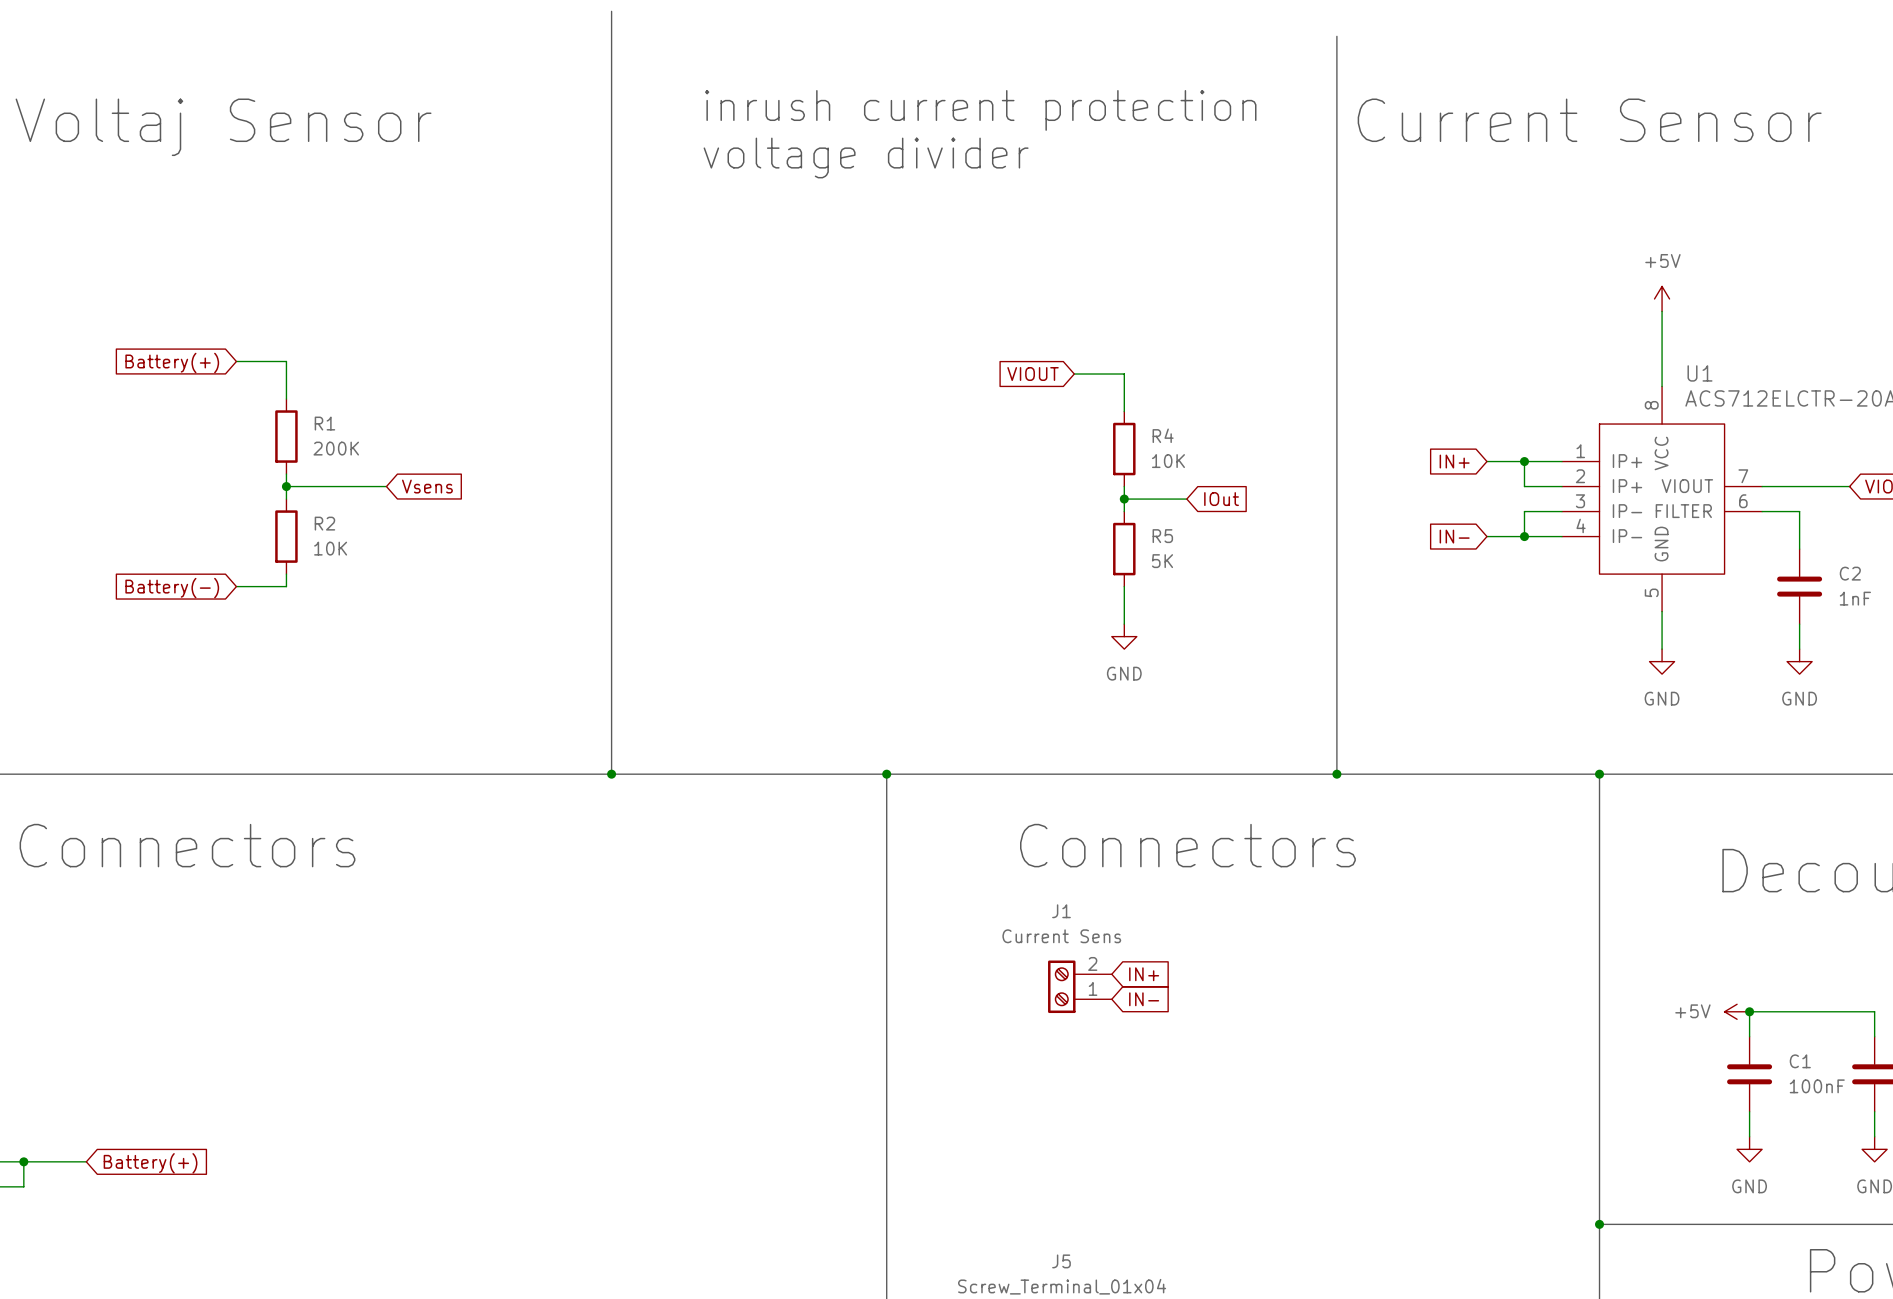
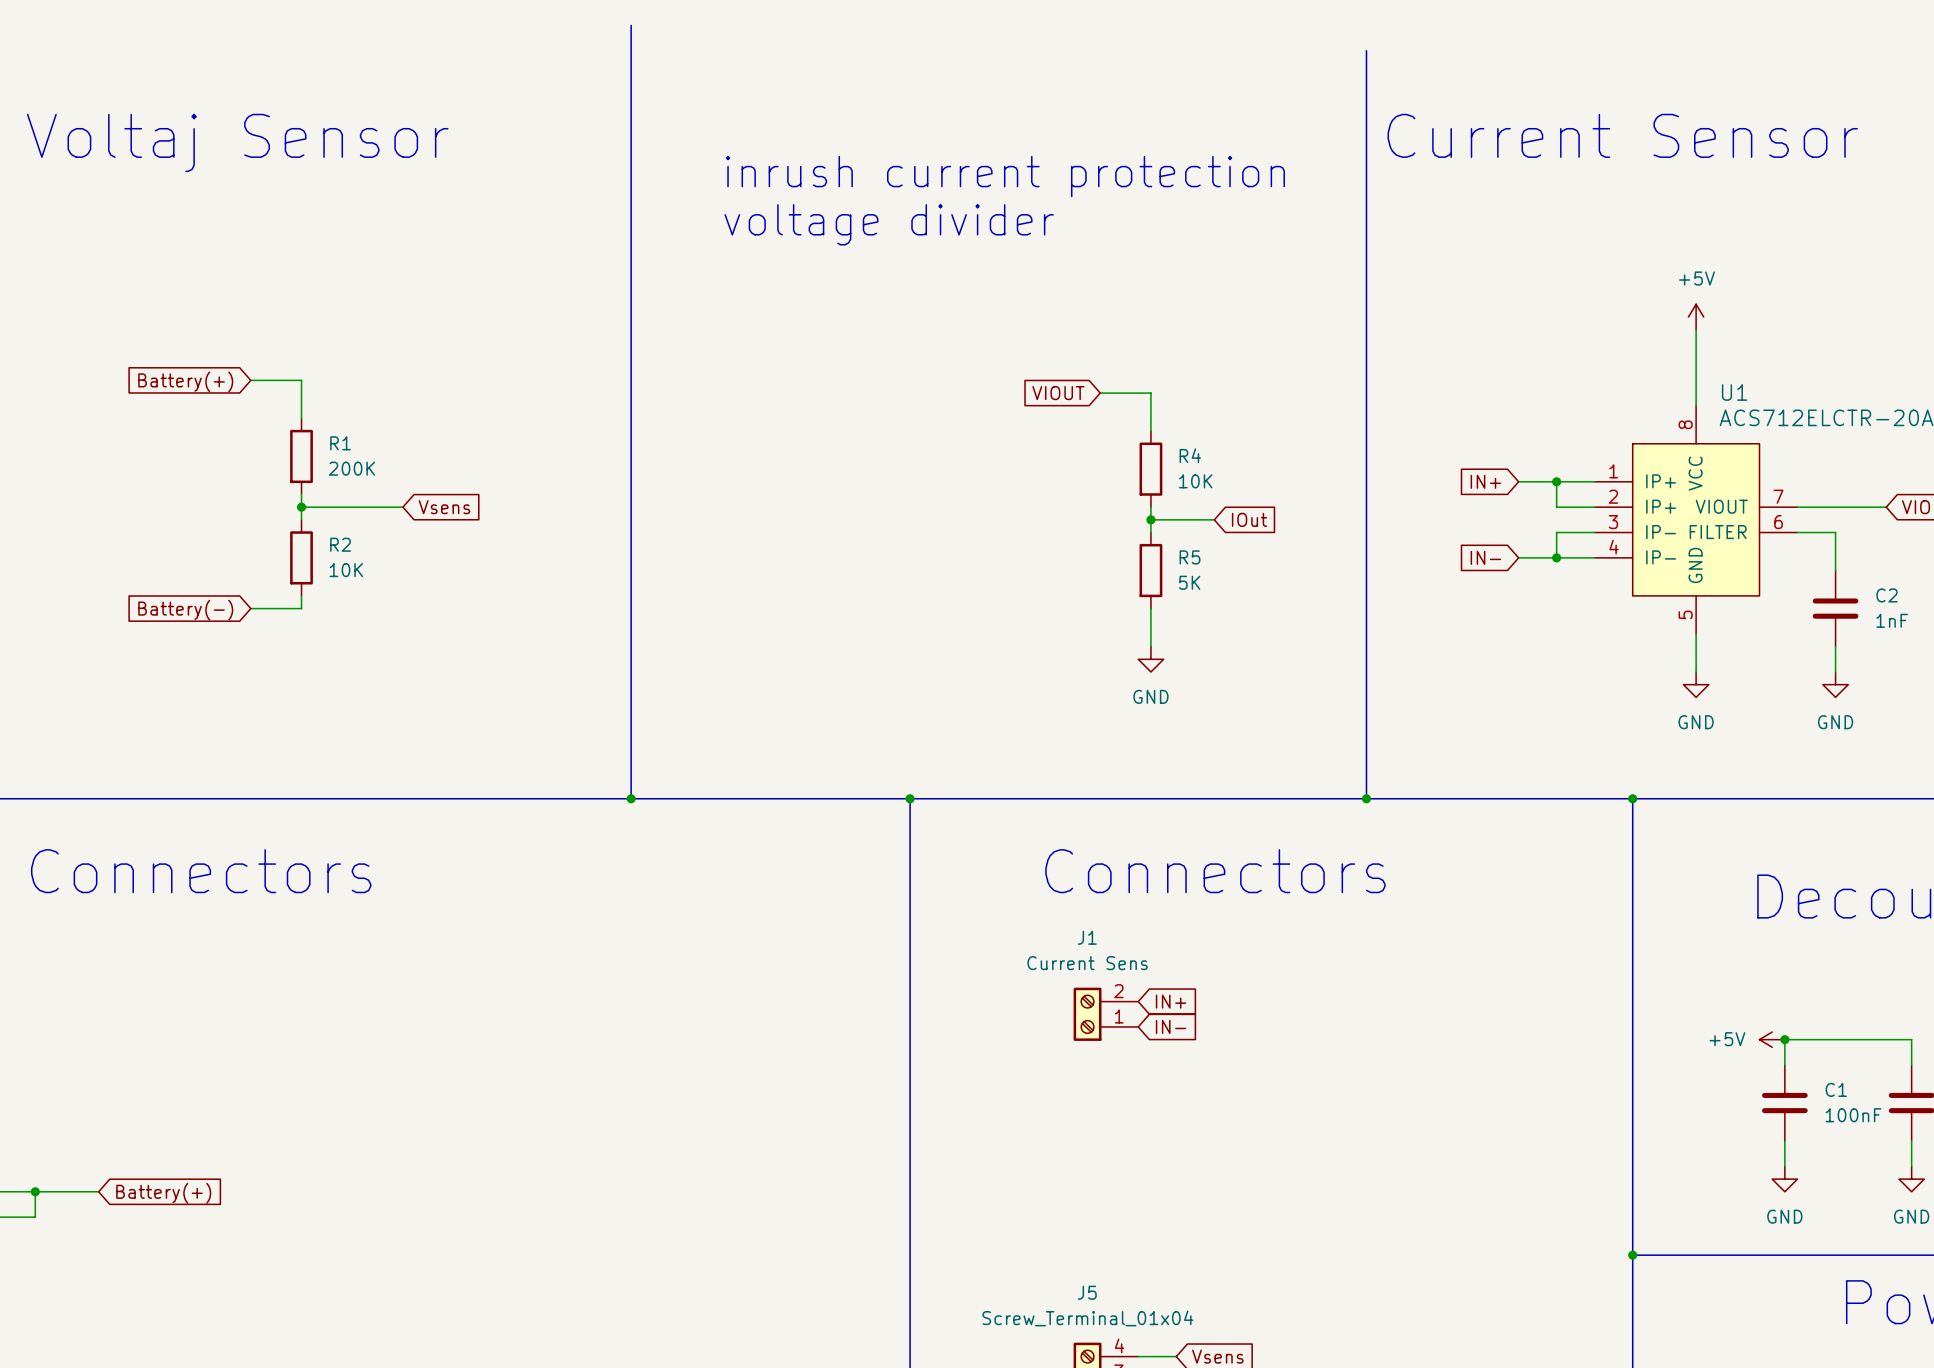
text position: inrush current protection (980, 110) -> inrush current protection (1005, 176)
text position: voltage divider (866, 157) -> voltage divider (889, 224)

